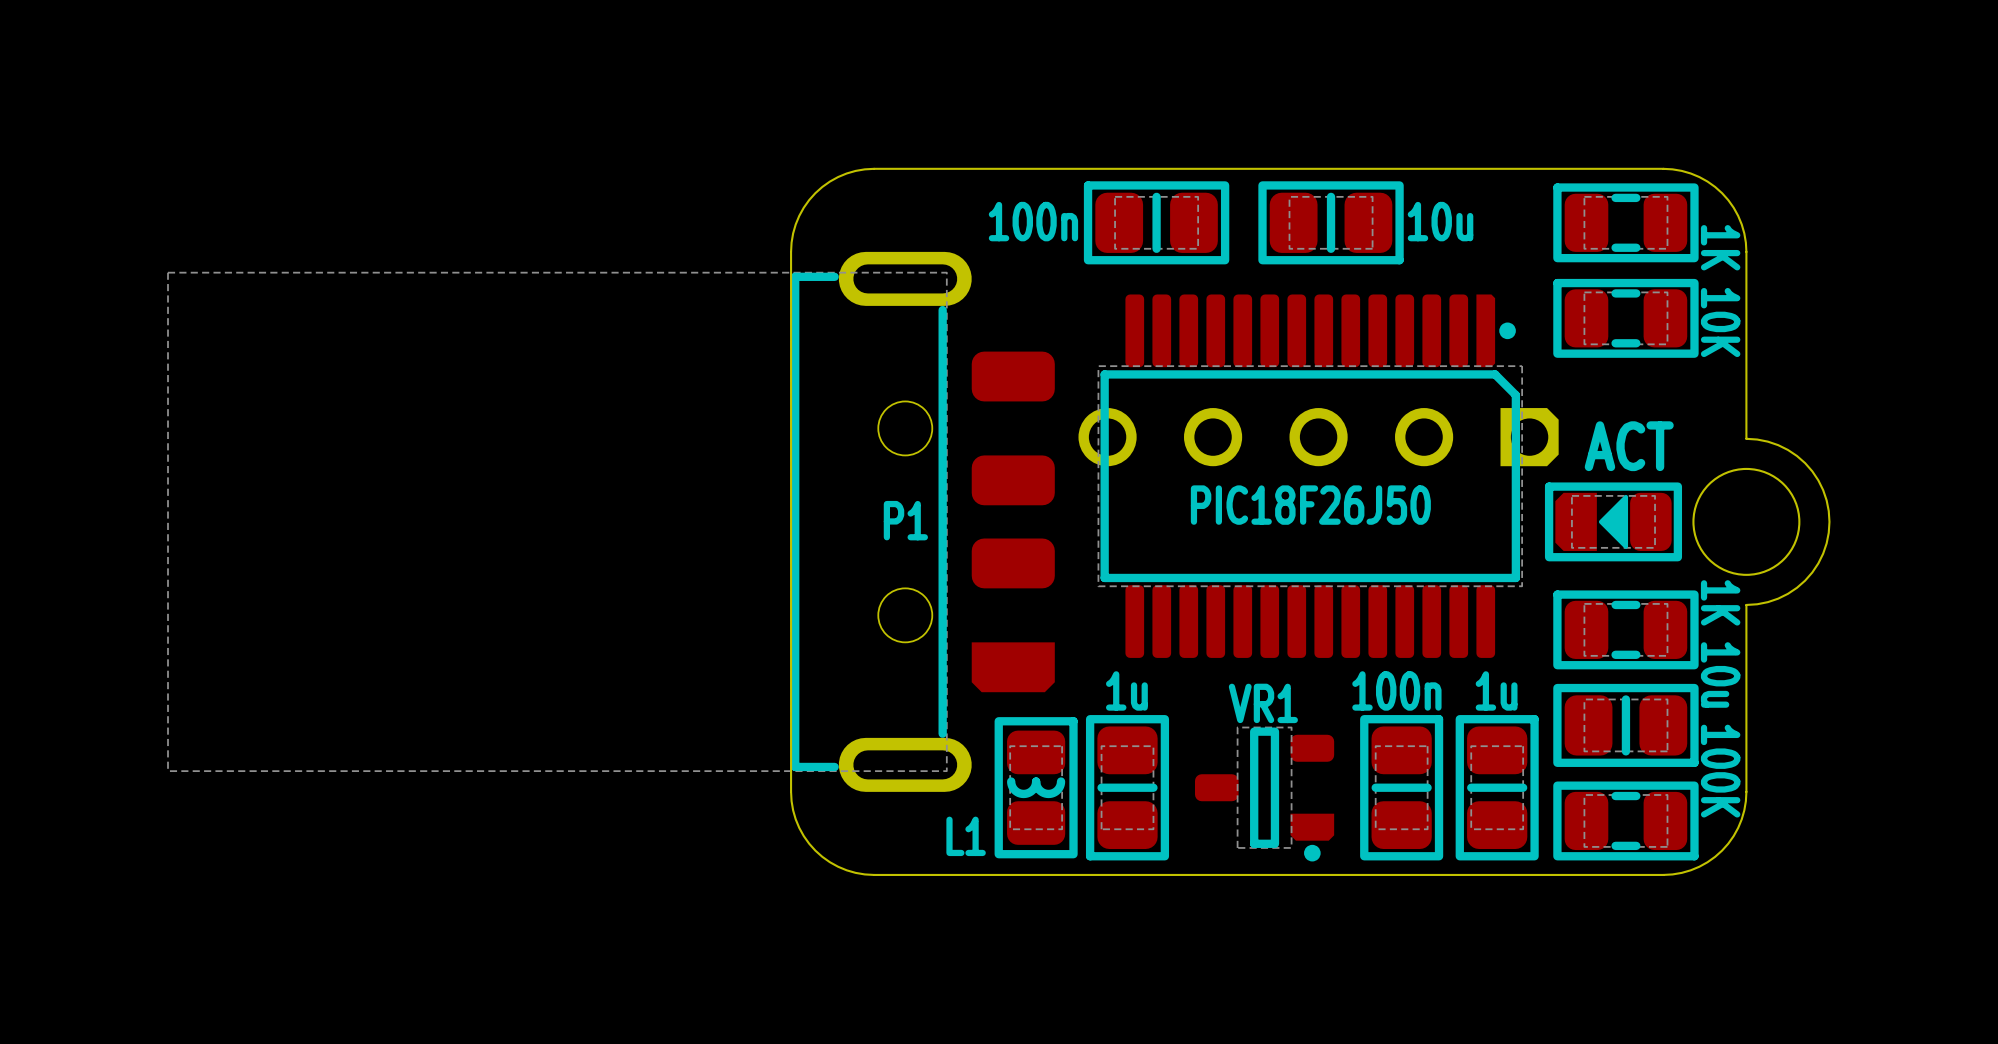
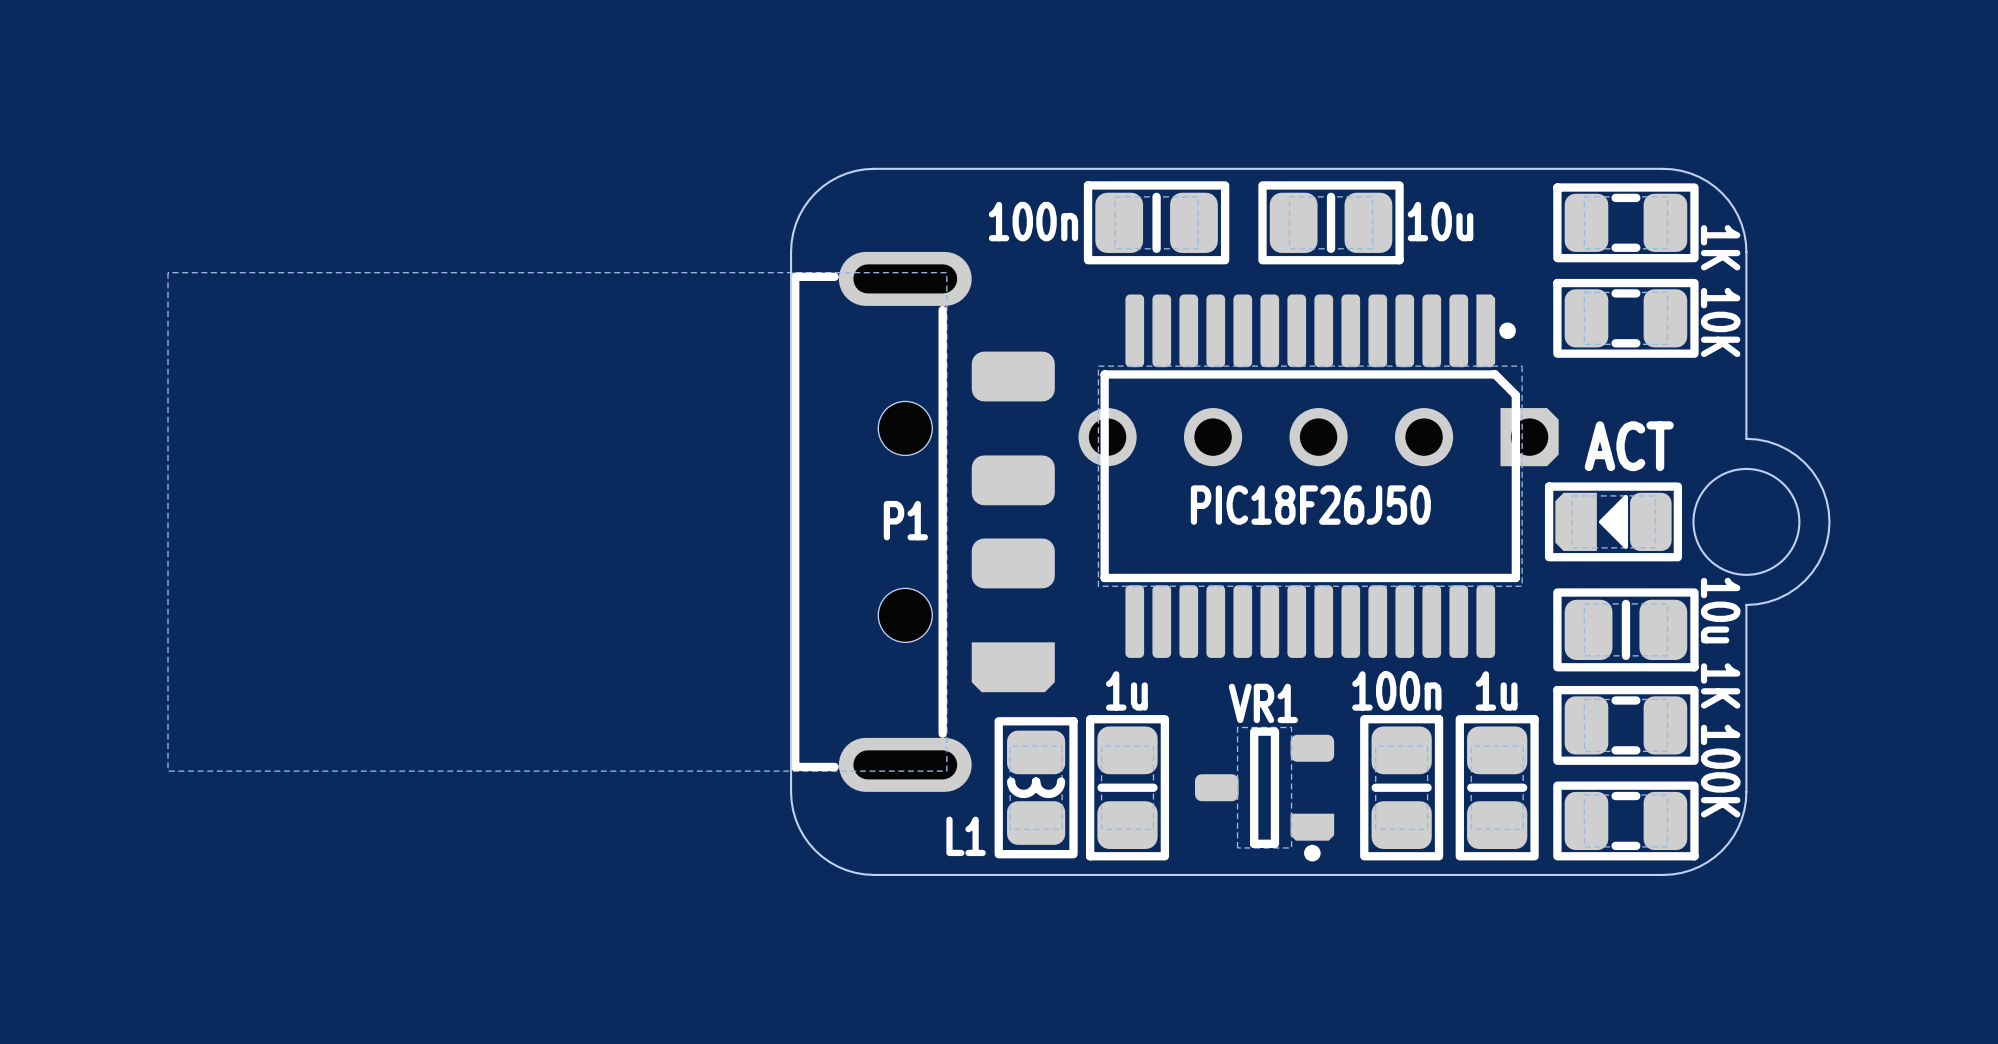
part footprint: [1553, 590, 1699, 670] -> [1553, 588, 1699, 672]
part value: 1K (1720, 602) -> 10u (1720, 610)
part value: 10u (1720, 674) -> 1K (1720, 685)
part footprint: [1553, 683, 1699, 767] -> [1553, 685, 1699, 765]

